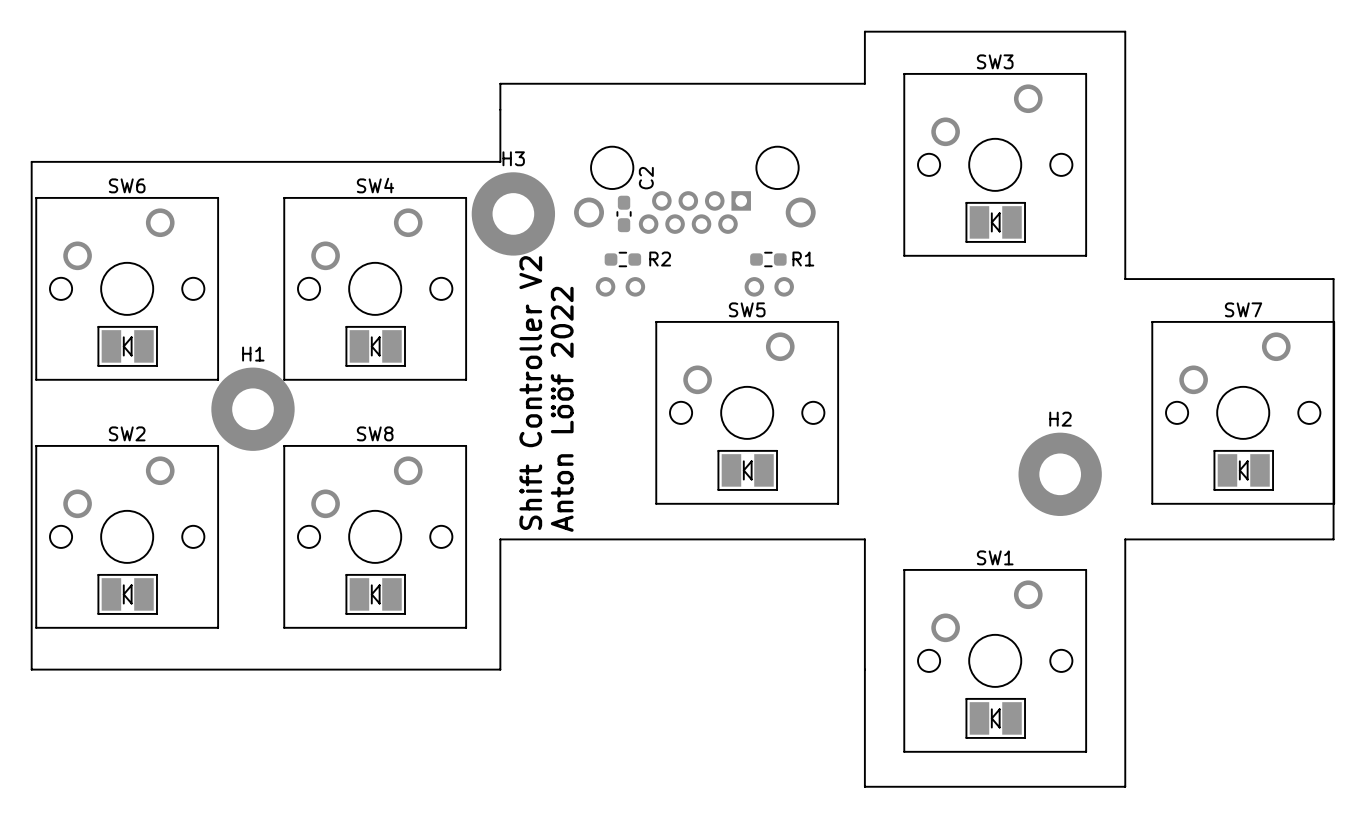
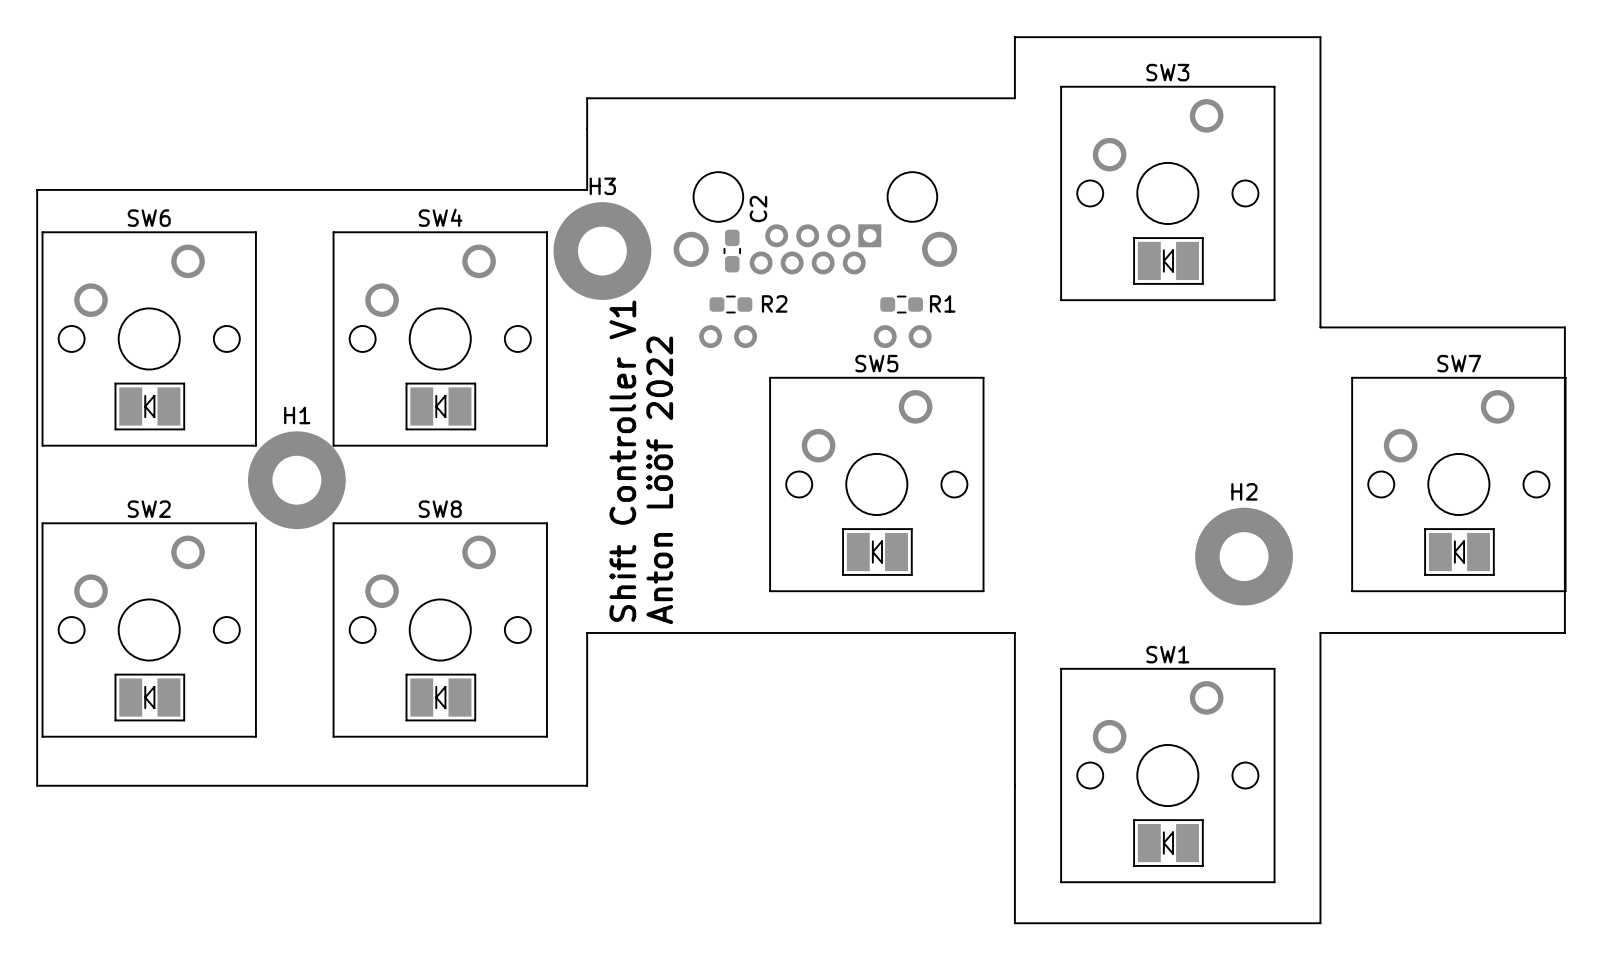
text: Shift Controller V2 (530, 393) -> Shift Controller V1 (622, 461)

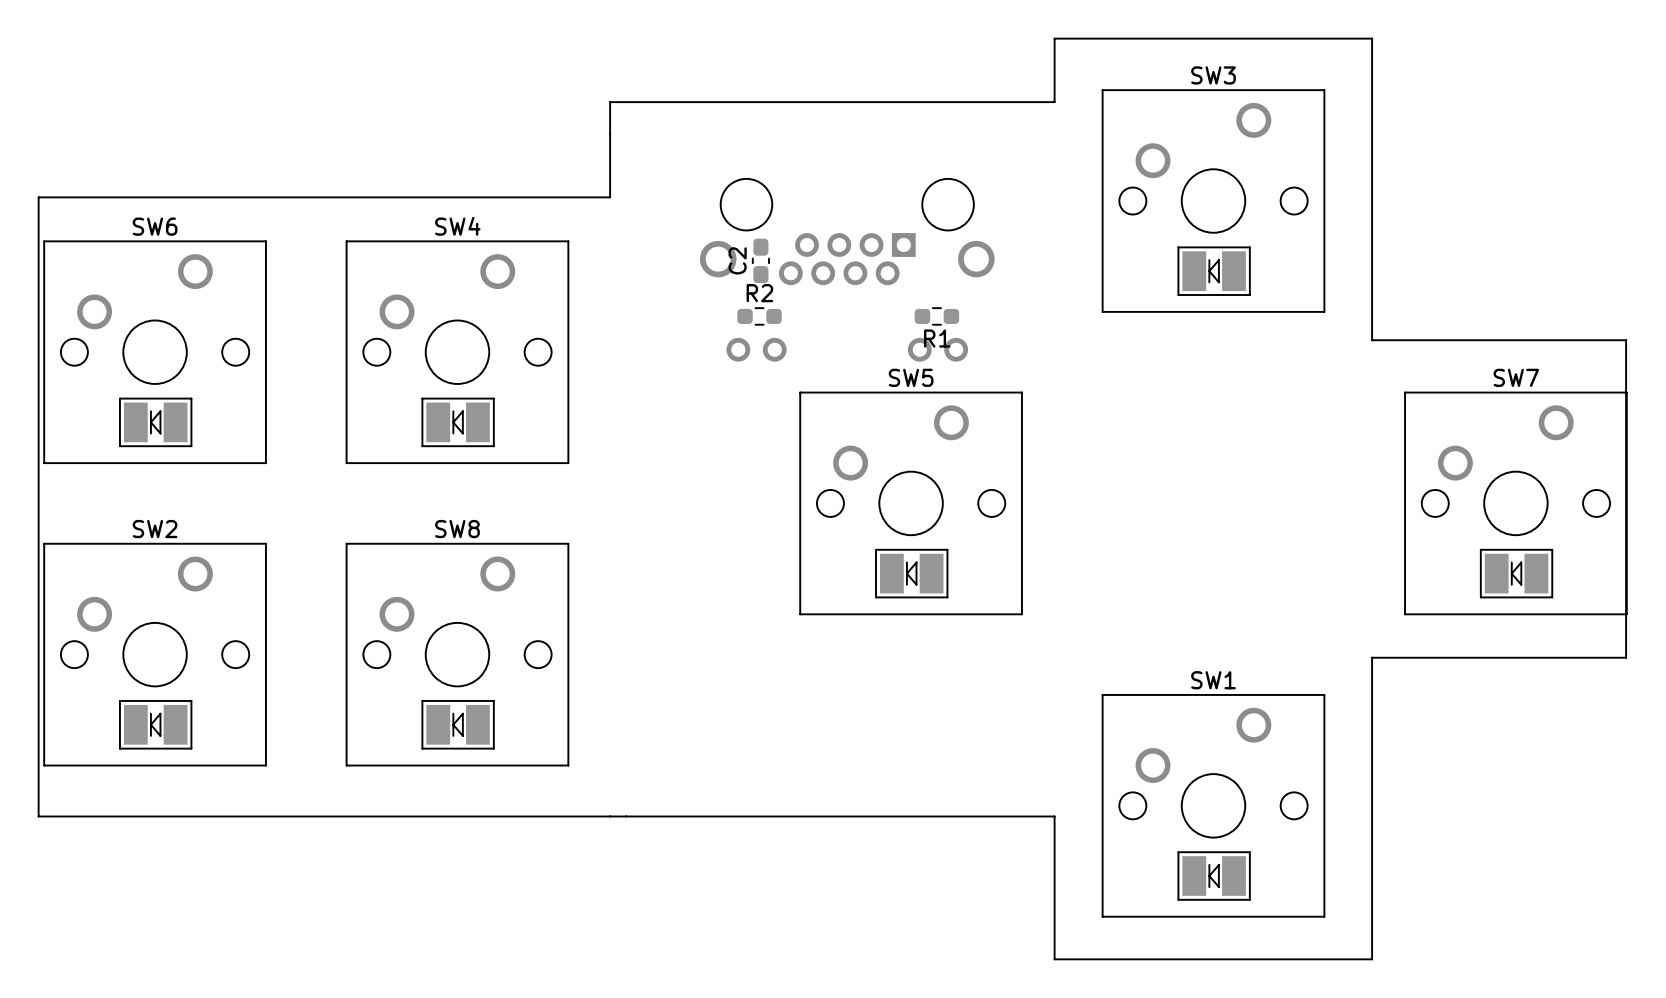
C2 name position: C2 (758, 209) -> C2 (737, 260)
H3: (602, 251) -> none
R2 name position: R2 (774, 303) -> R2 (759, 293)
R1 name position: R1 (942, 303) -> R1 (937, 338)
text: Shift Controller V1 (622, 461) -> none
H1: (296, 480) -> none
text: Anton Lööf 2022 (659, 480) -> none
H2: (1244, 556) -> none
board edge: (587, 785) (587, 632) (1014, 632) (1014, 785) -> (610, 816) (1054, 816)

